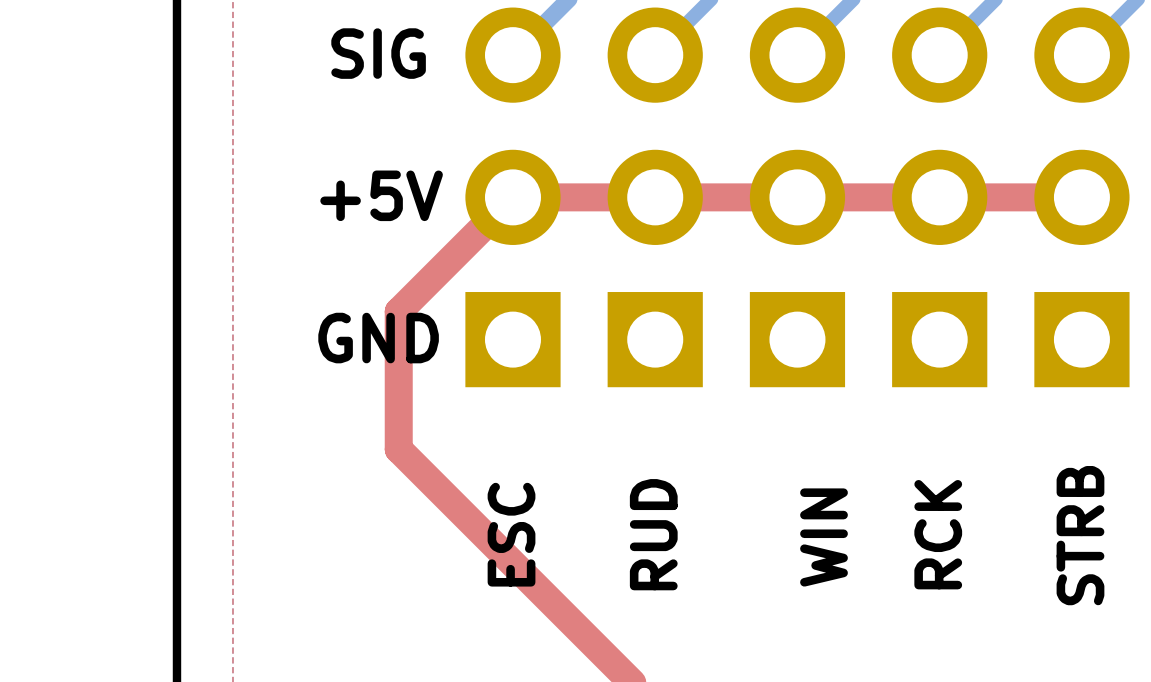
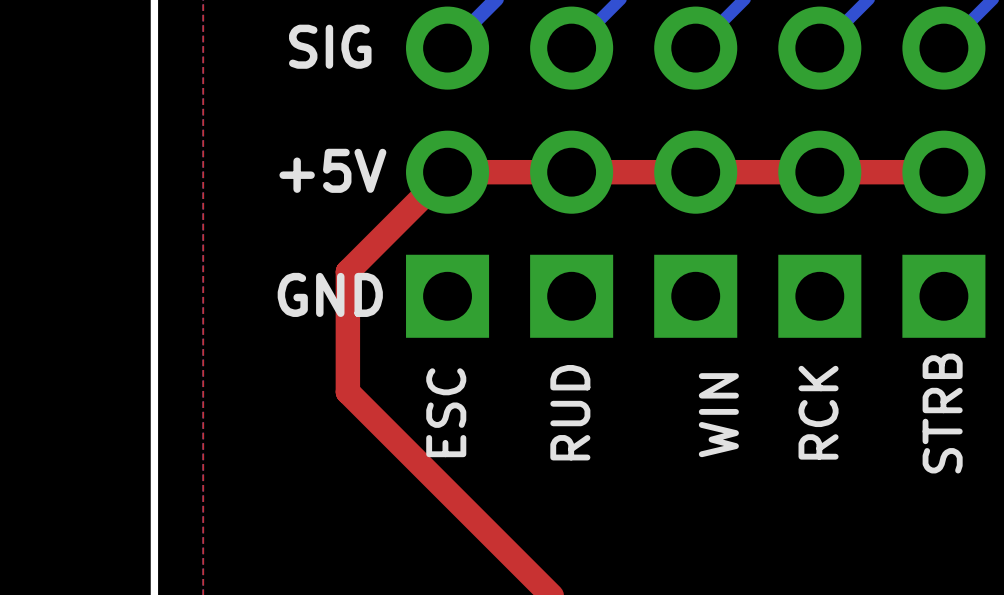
ESC name position: ESC (511, 534) -> ESC (446, 412)
RUD name position: RUD (653, 534) -> RUD (570, 412)
RCK name position: RCK (938, 534) -> RCK (818, 412)
STRB name position: STRB (1080, 535) -> STRB (942, 413)
WIN name position: WIN (824, 537) -> WIN (718, 415)

